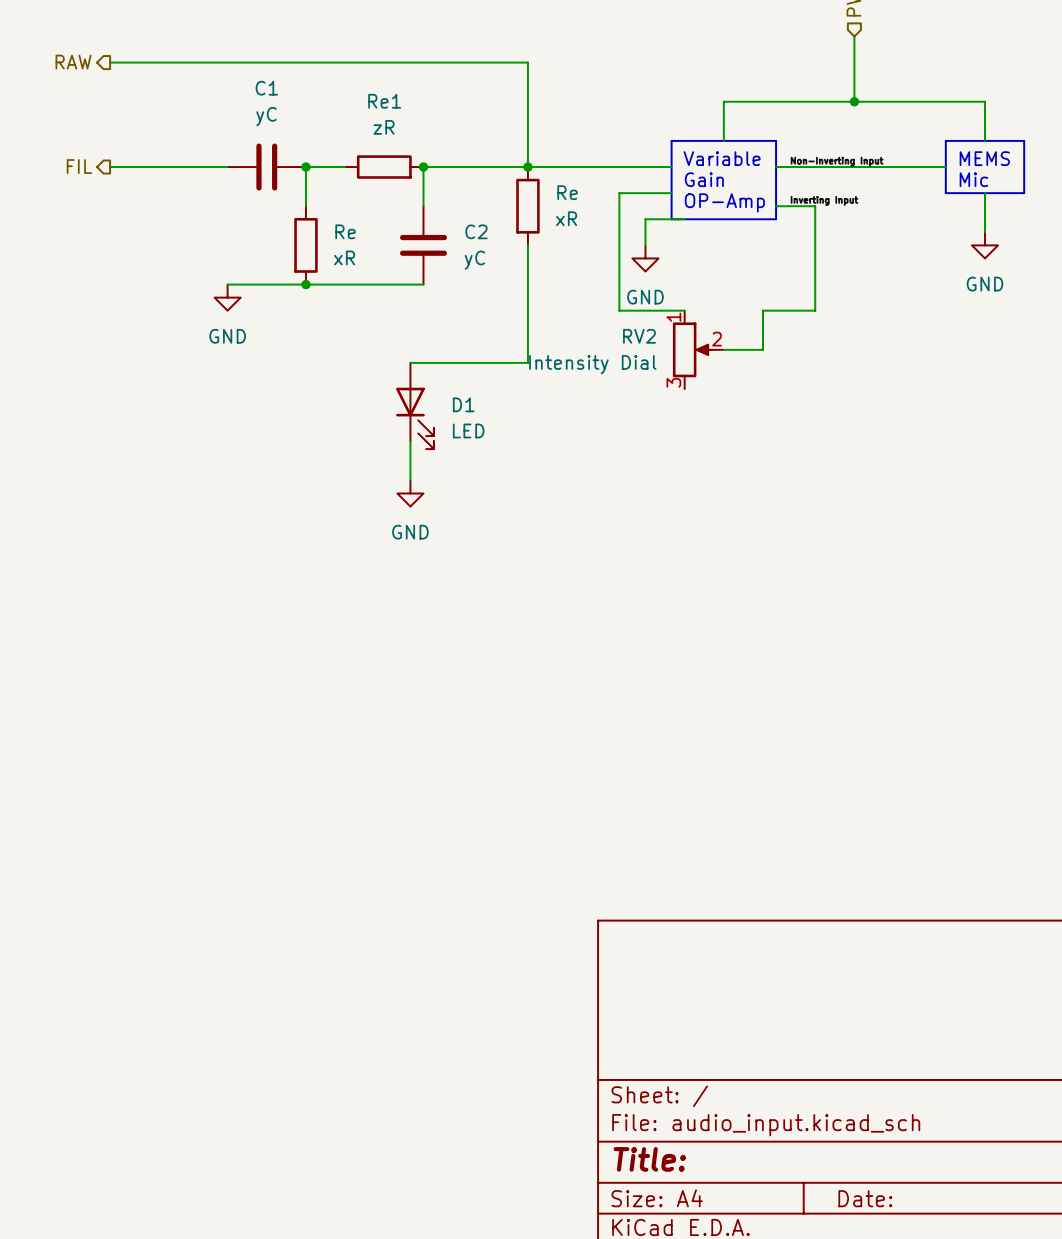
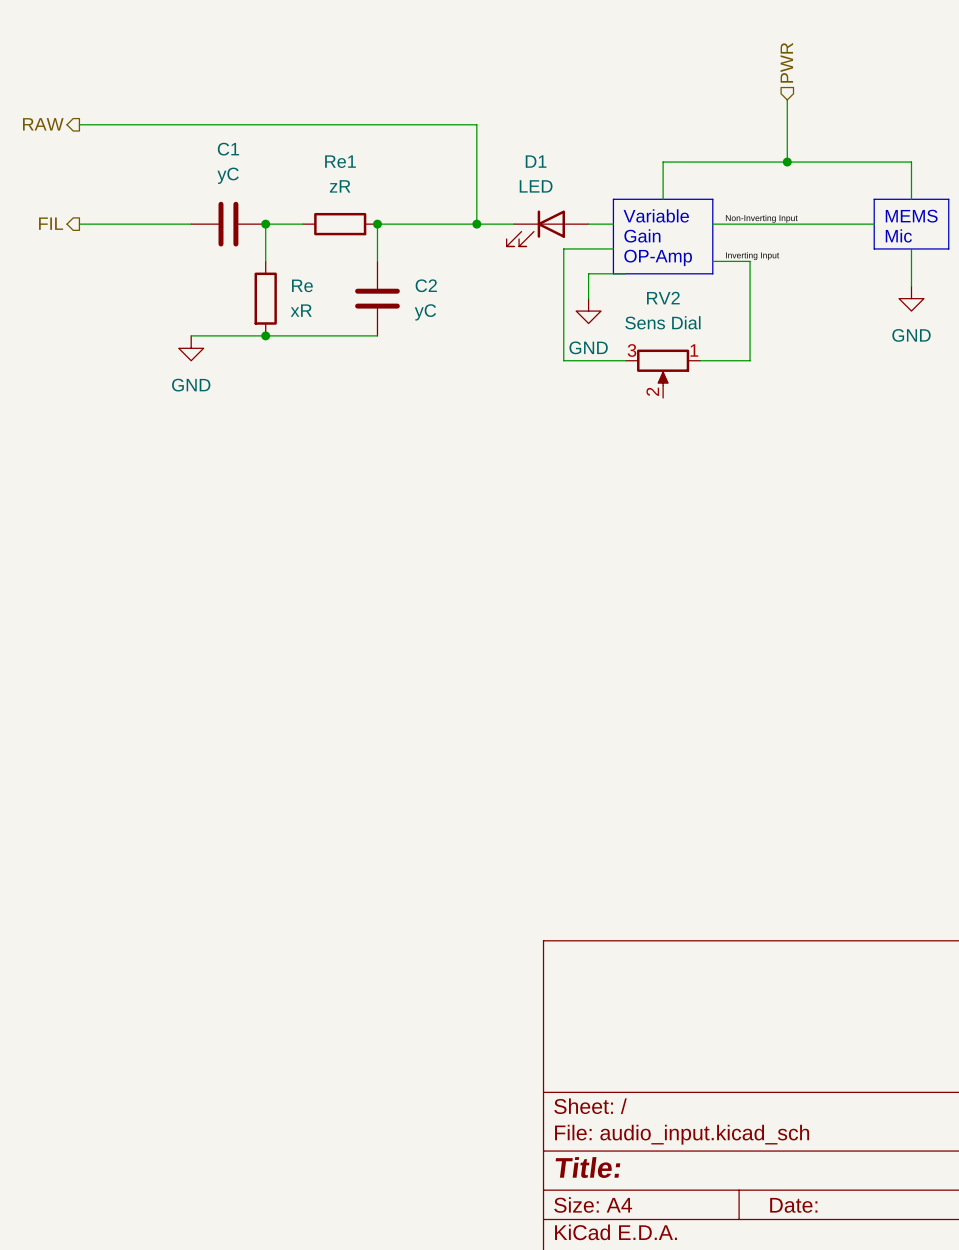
Re: xR (527, 206) -> none
wire: (527, 245) (527, 362) (410, 362) -> none
wire: (763, 310) (763, 349) (723, 349) -> none
RV2 name position: RV2 (639, 336) -> RV2 (663, 298)
RV2 rotation: 0° (691, 349) -> 90° clockwise (663, 367)
RV2 value: Intensity Dial (592, 364) -> Sens Dial (662, 322)
D1 name position: D1 (463, 404) -> D1 (536, 161)
D1 position: (415, 406) -> (547, 228)
D1 rotation: 0° (415, 418) -> 90° clockwise (535, 228)
D1 value position: LED (468, 430) -> LED (536, 186)
wire: (410, 441) (410, 480) -> none
power symbol: GND (410, 493) -> none

